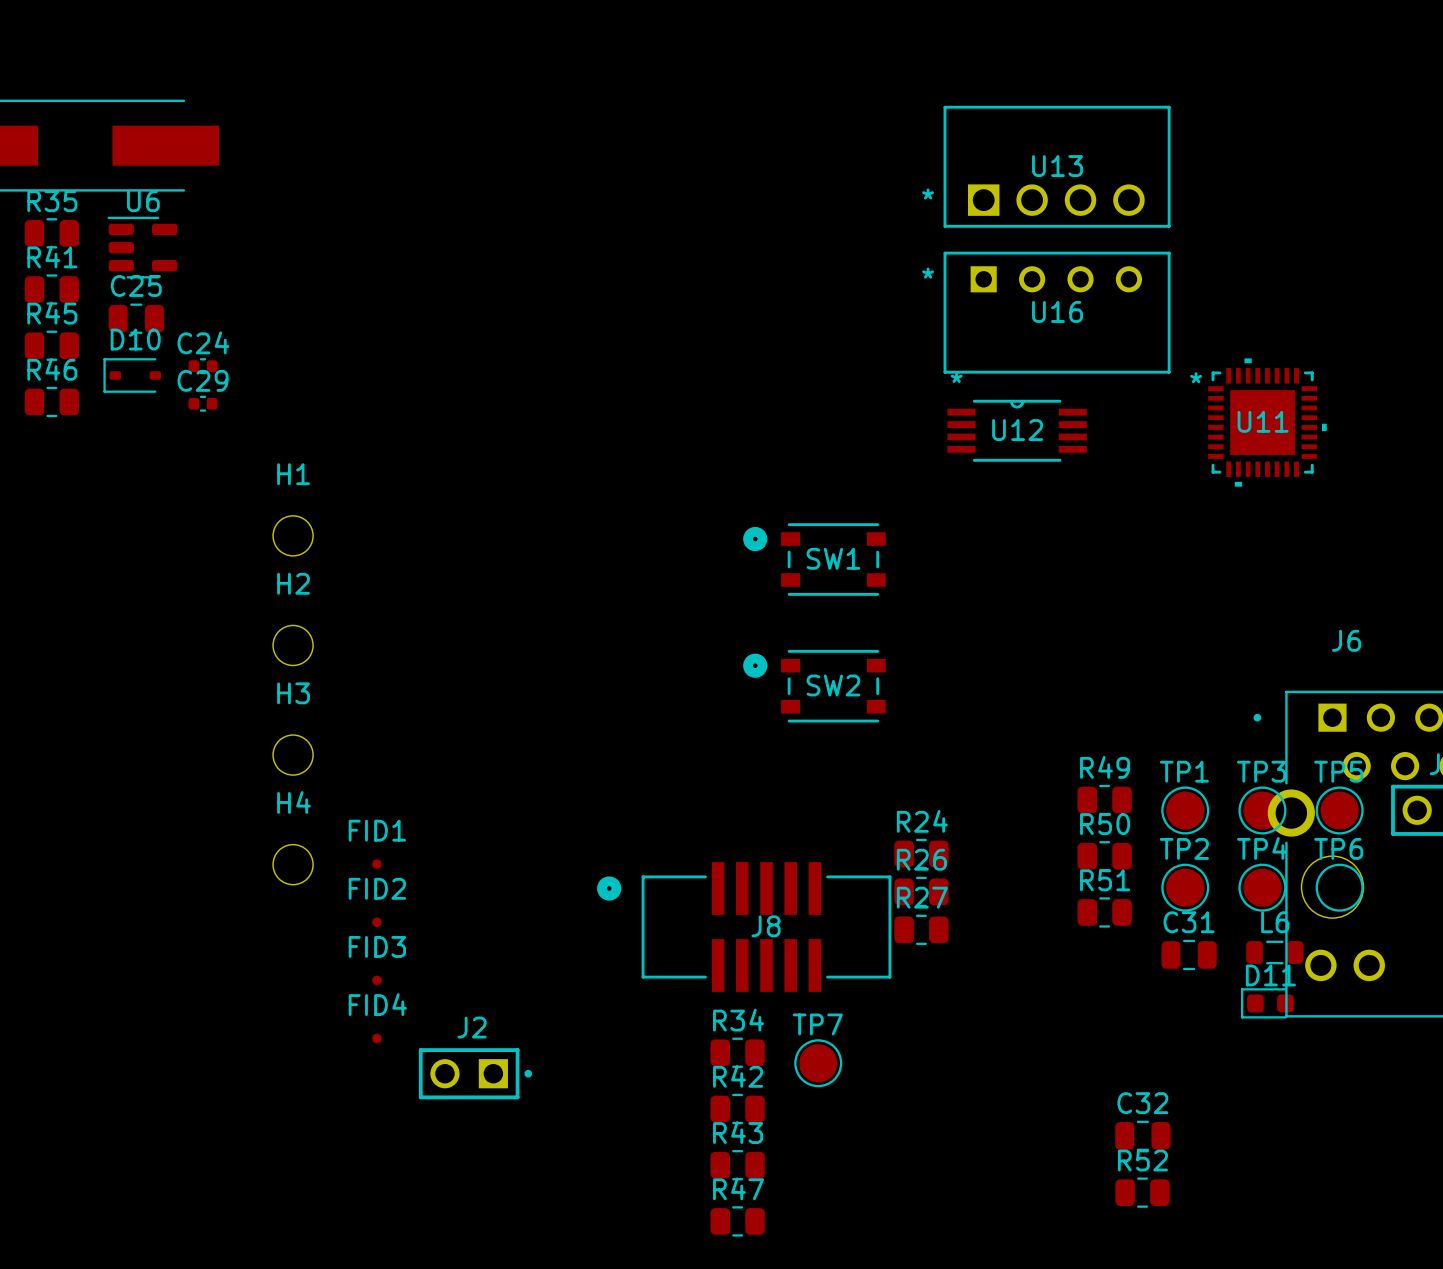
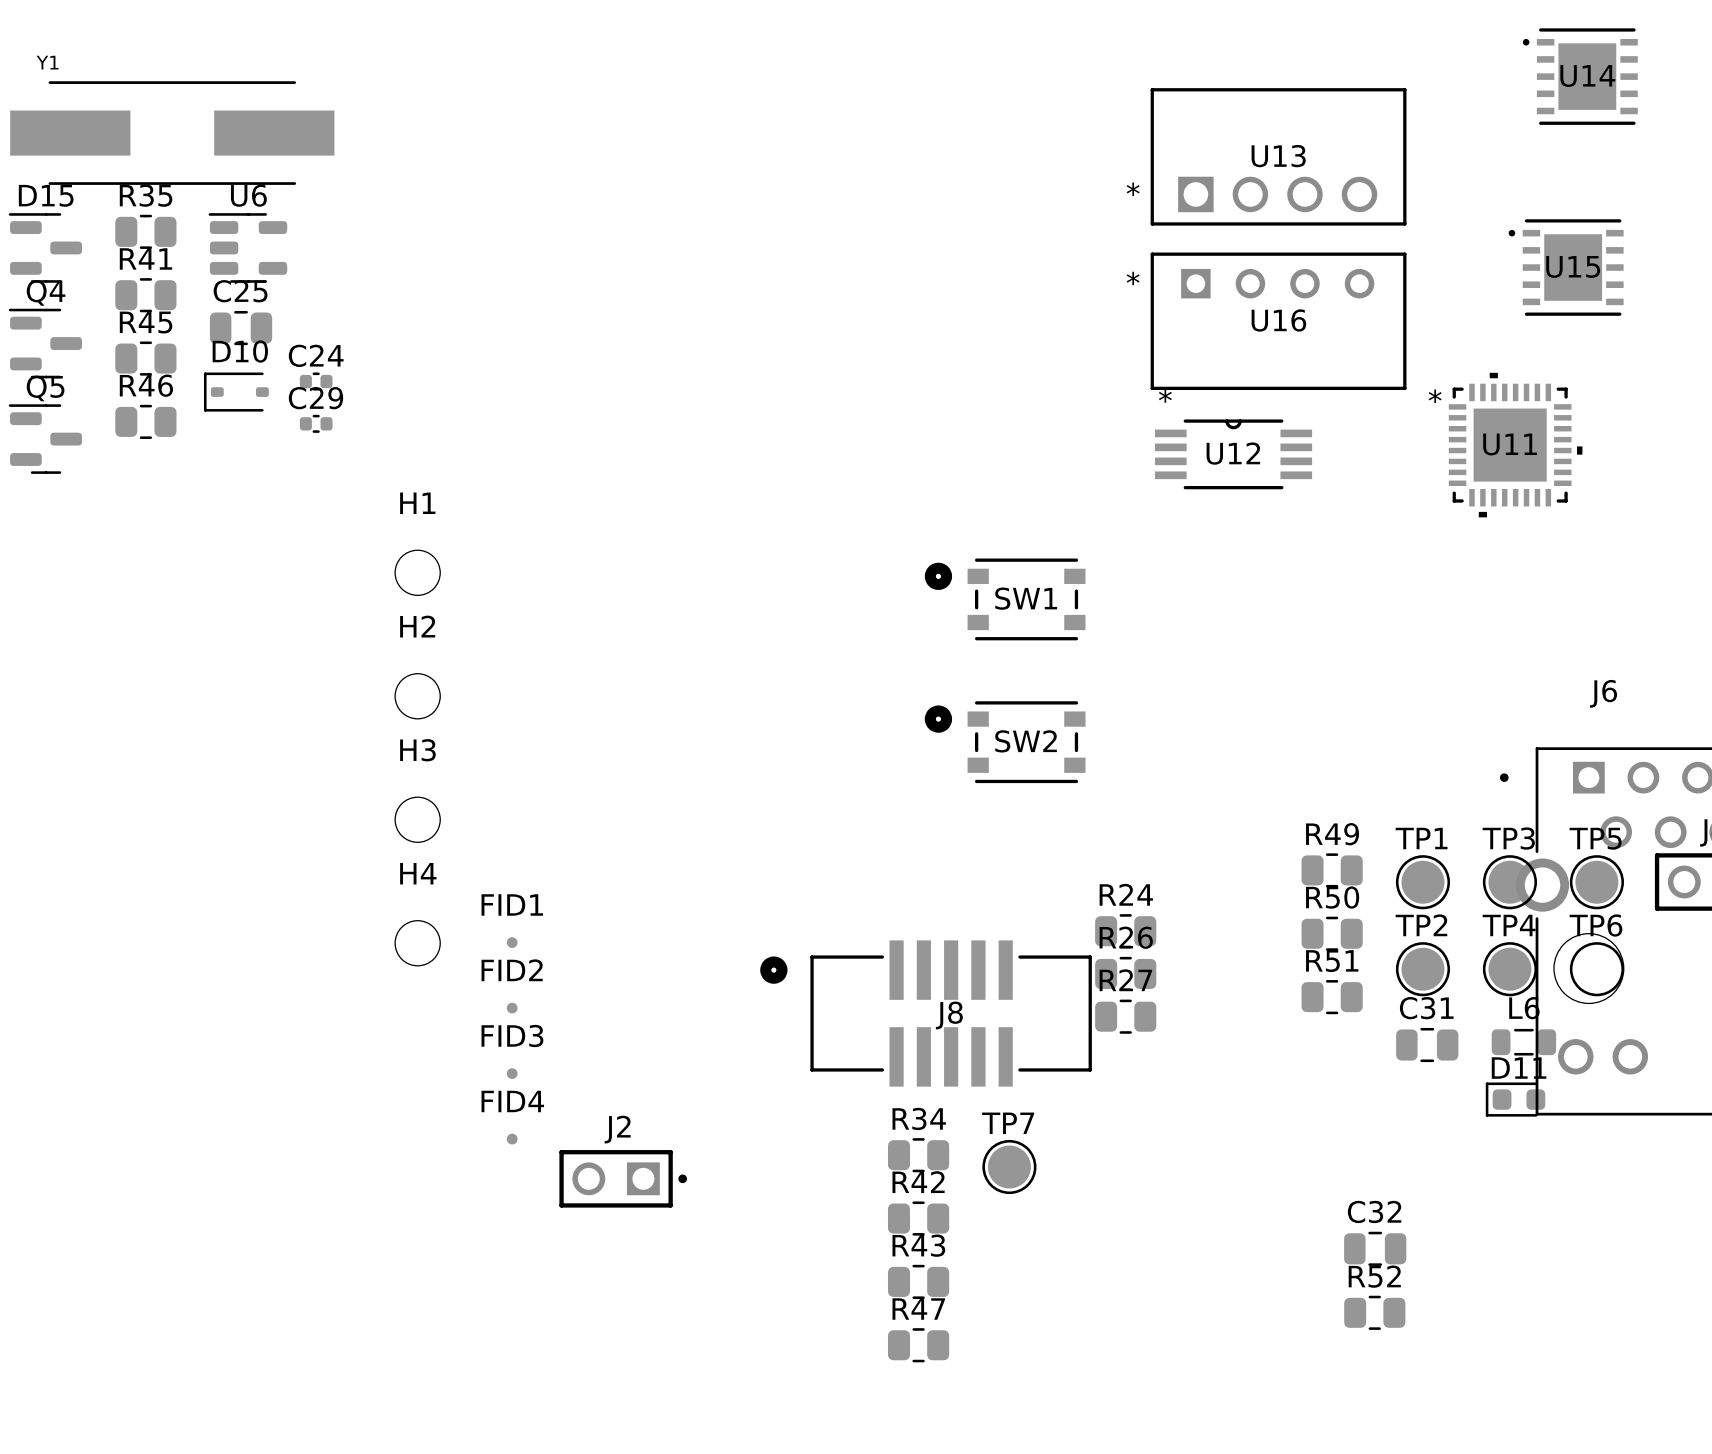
U14: none -> (1580, 76)
U15: none -> (1566, 267)

